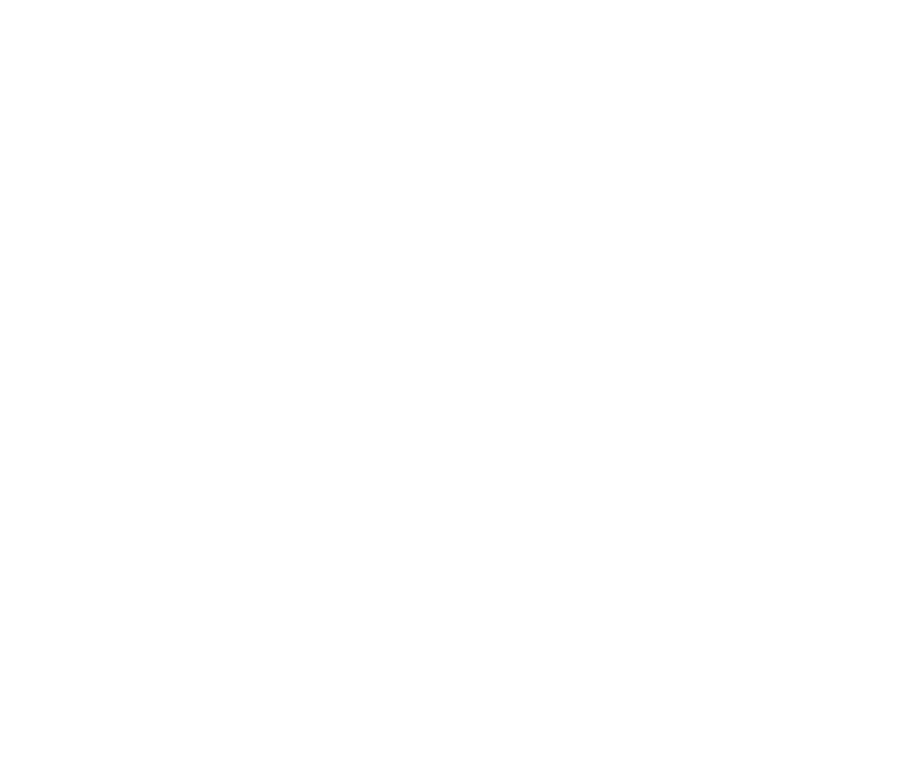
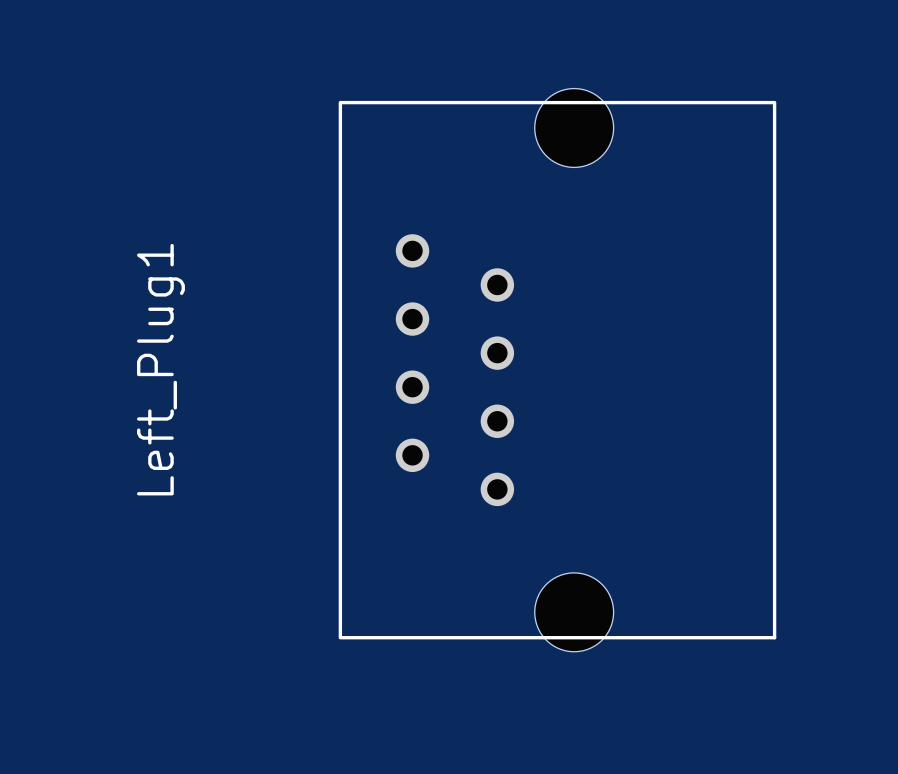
Left_Plug1: none -> (557, 370)

